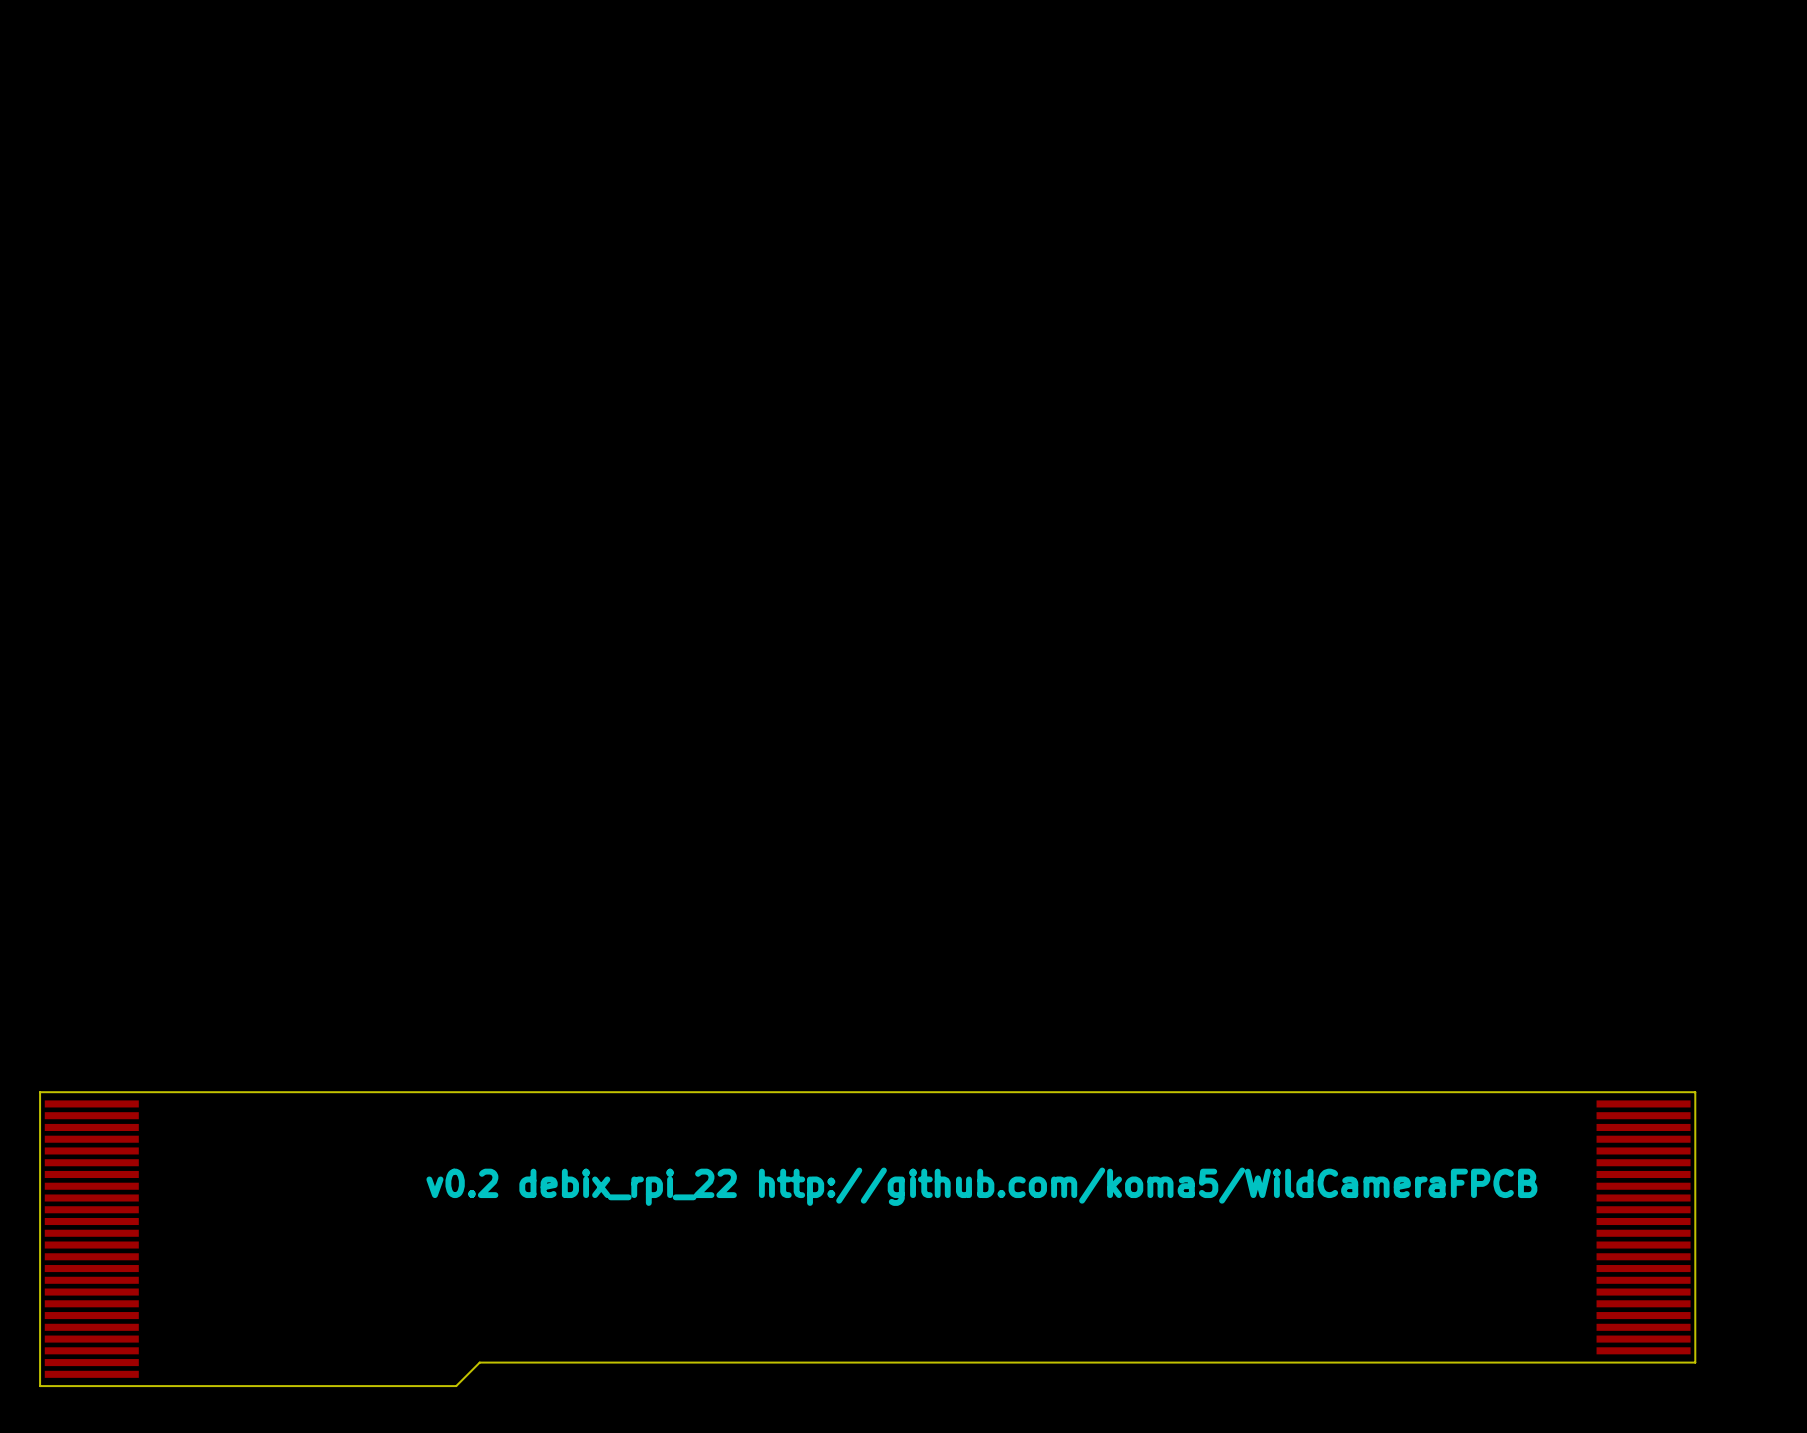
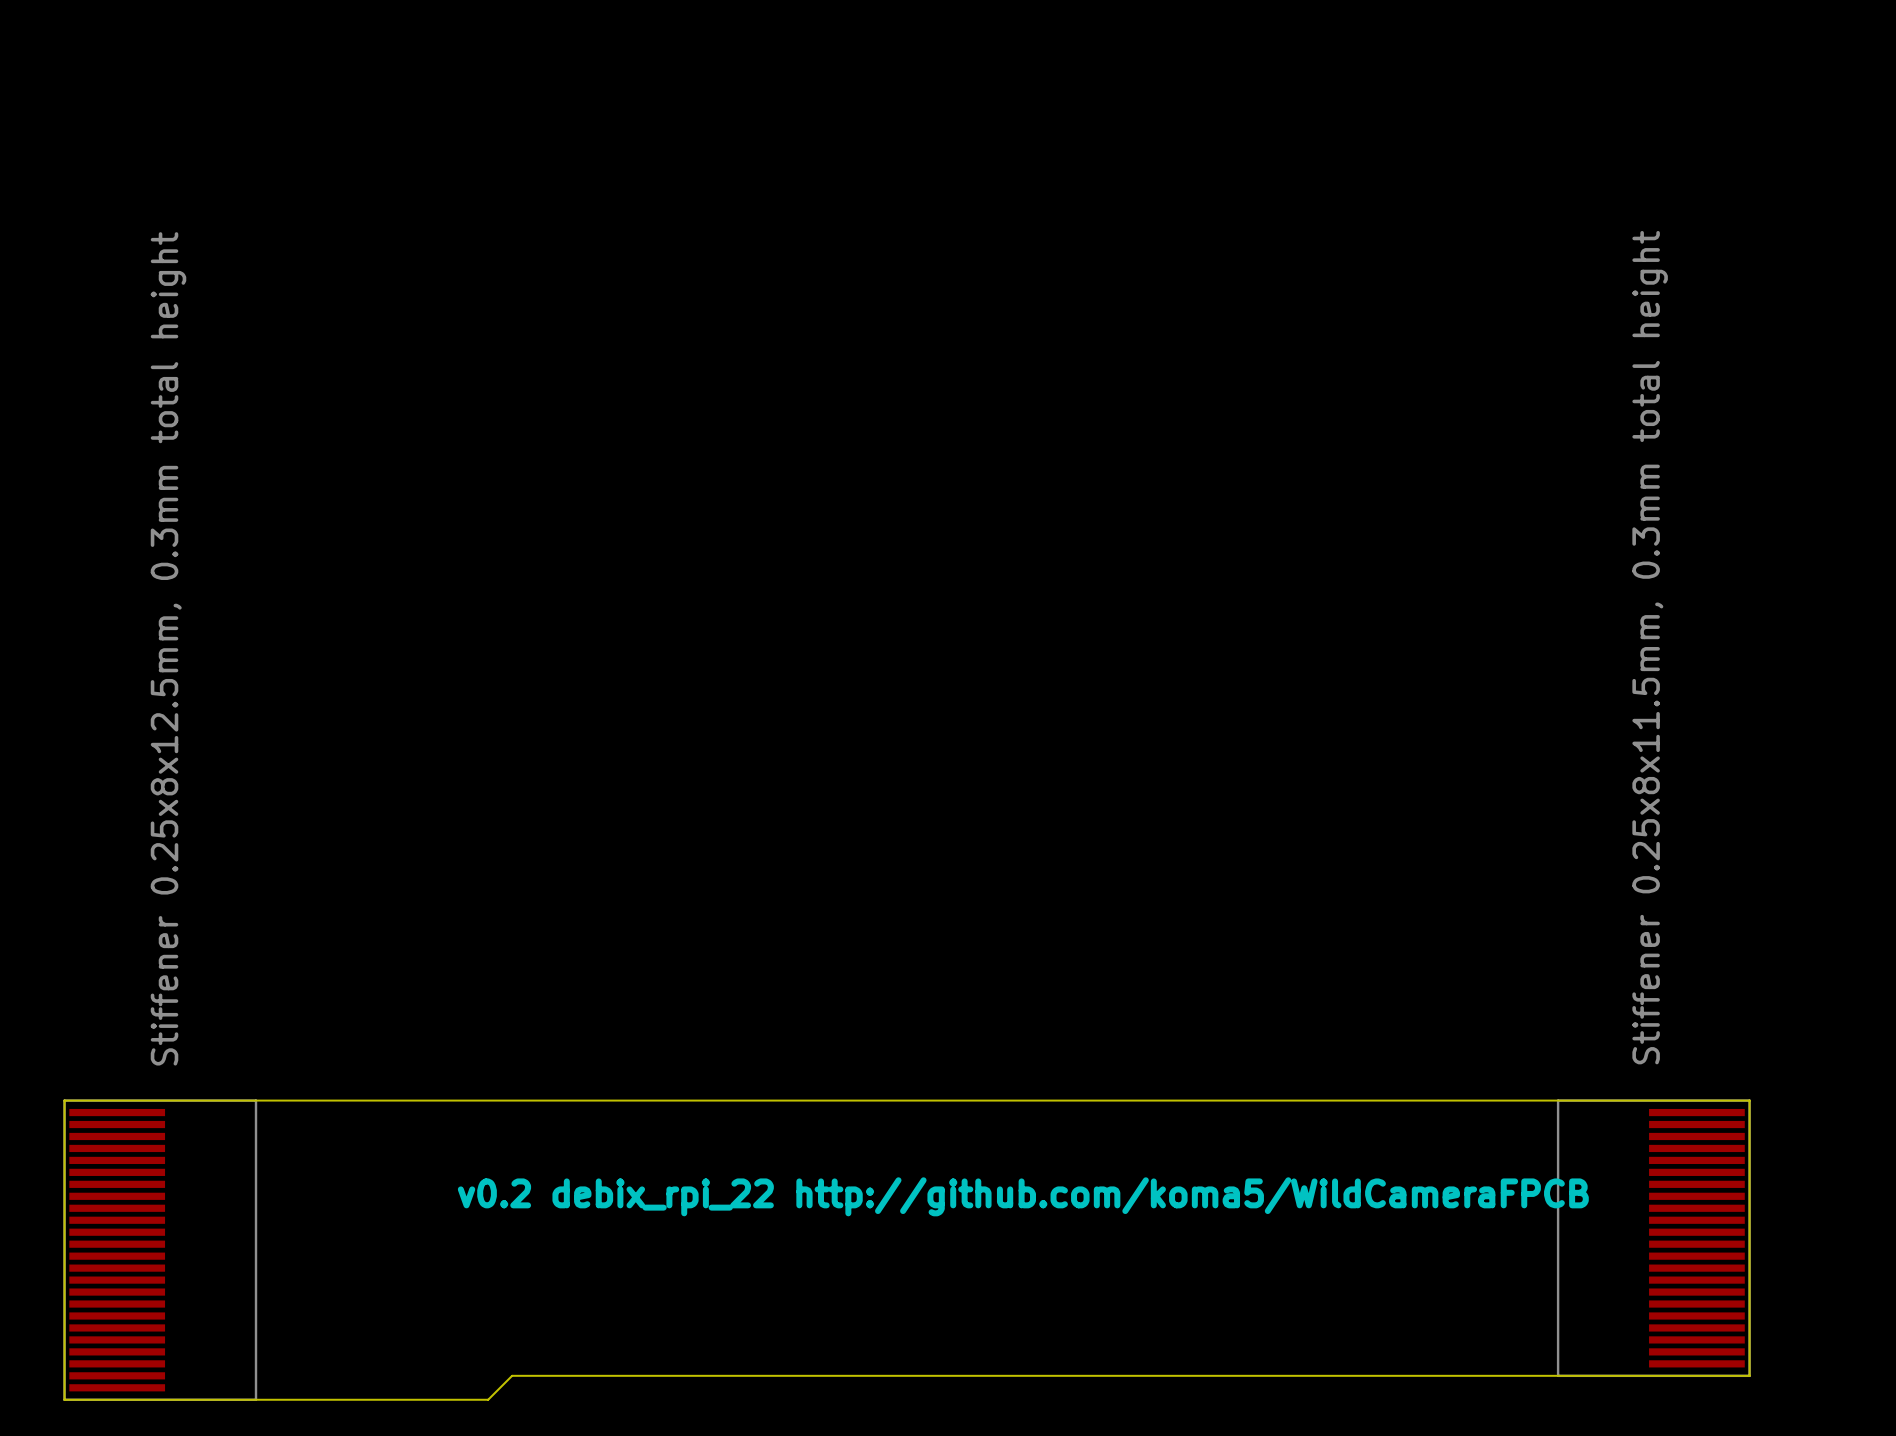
text: none -> Stiffener 0.25x8x11.5mm, 0.3mm total height (1650, 647)
text: none -> Stiffener 0.25x8x12.5mm, 0.3mm total height (168, 648)
line: none -> (64, 1100) (256, 1100) (256, 1399) (64, 1399) (64, 1100)
line: none -> (1558, 1100) (1749, 1100) (1749, 1375) (1558, 1375) (1558, 1100)

